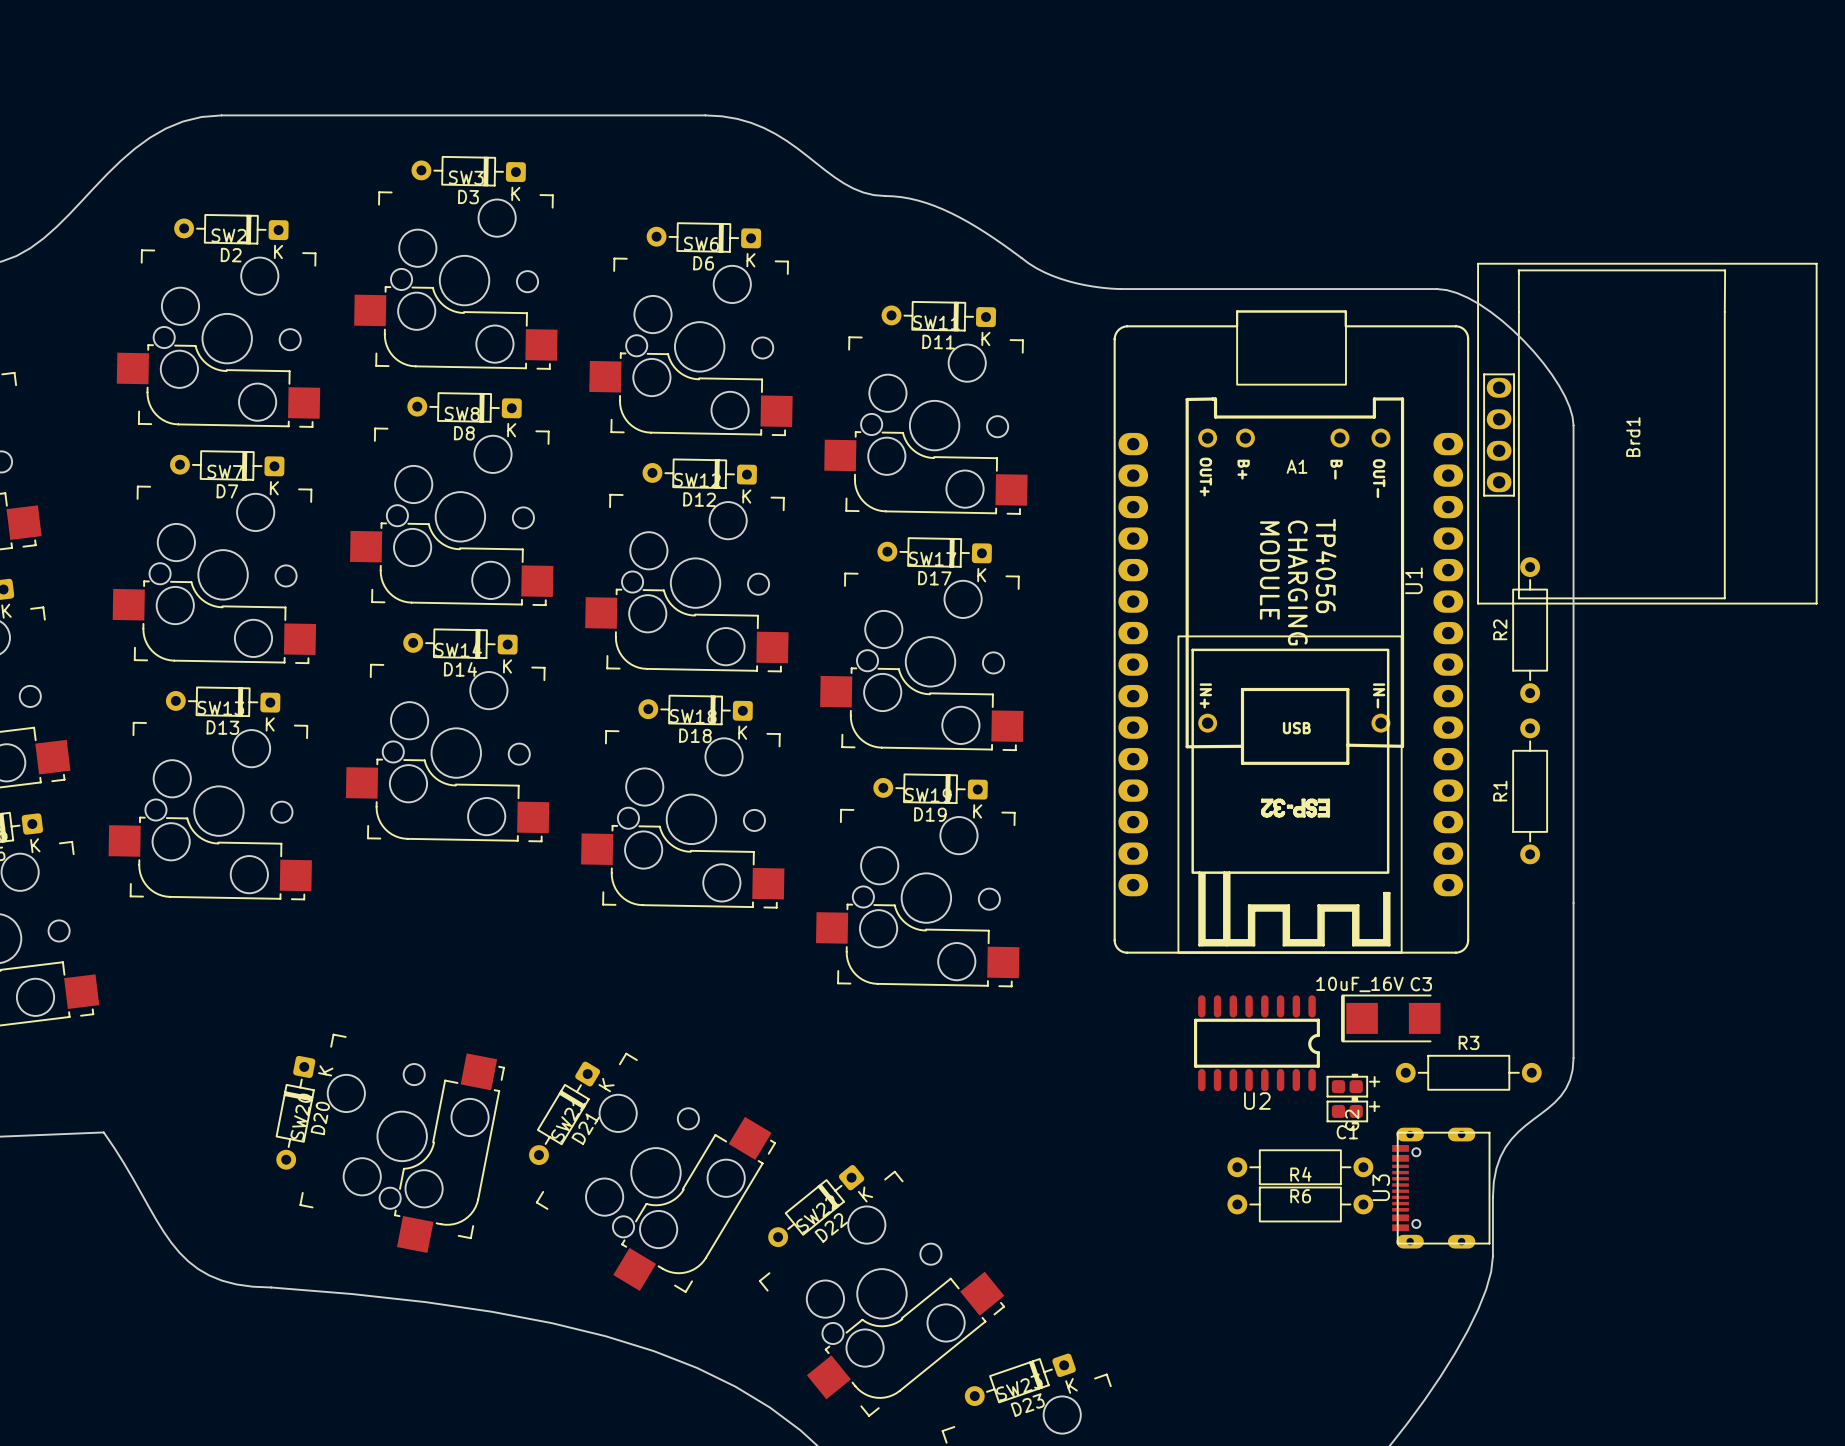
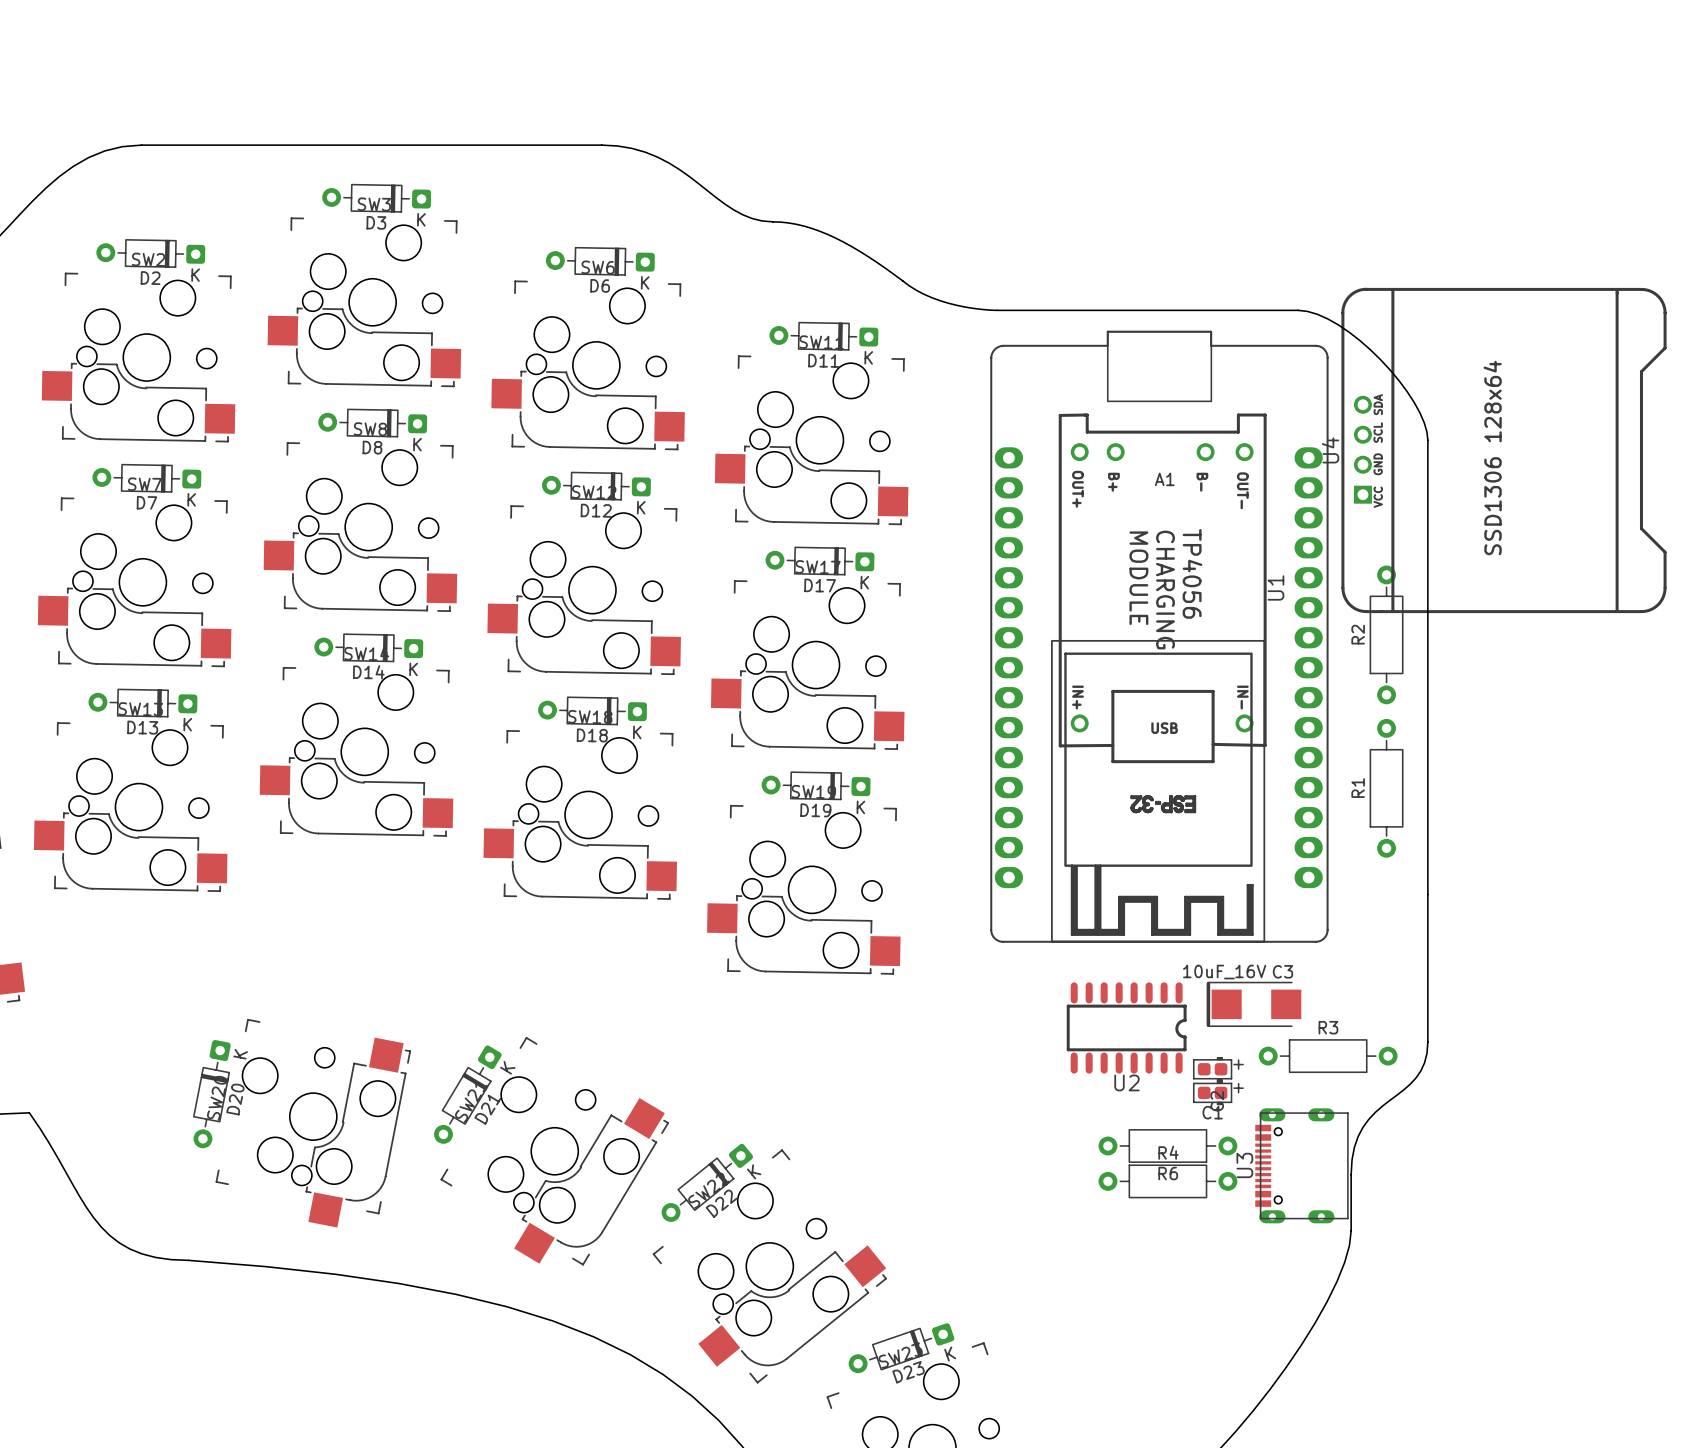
Brd1: (1647, 433) -> none
U4: none -> (1503, 450)

